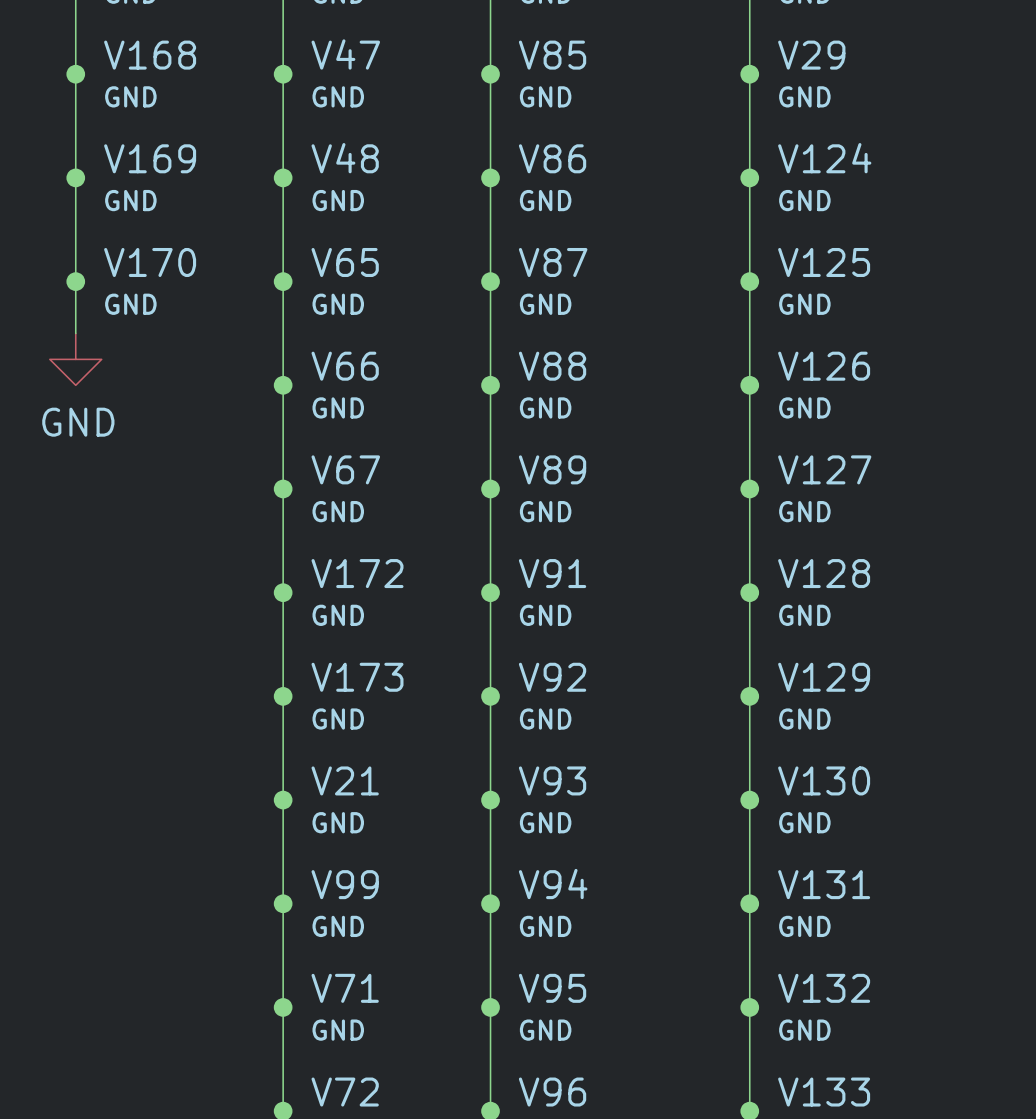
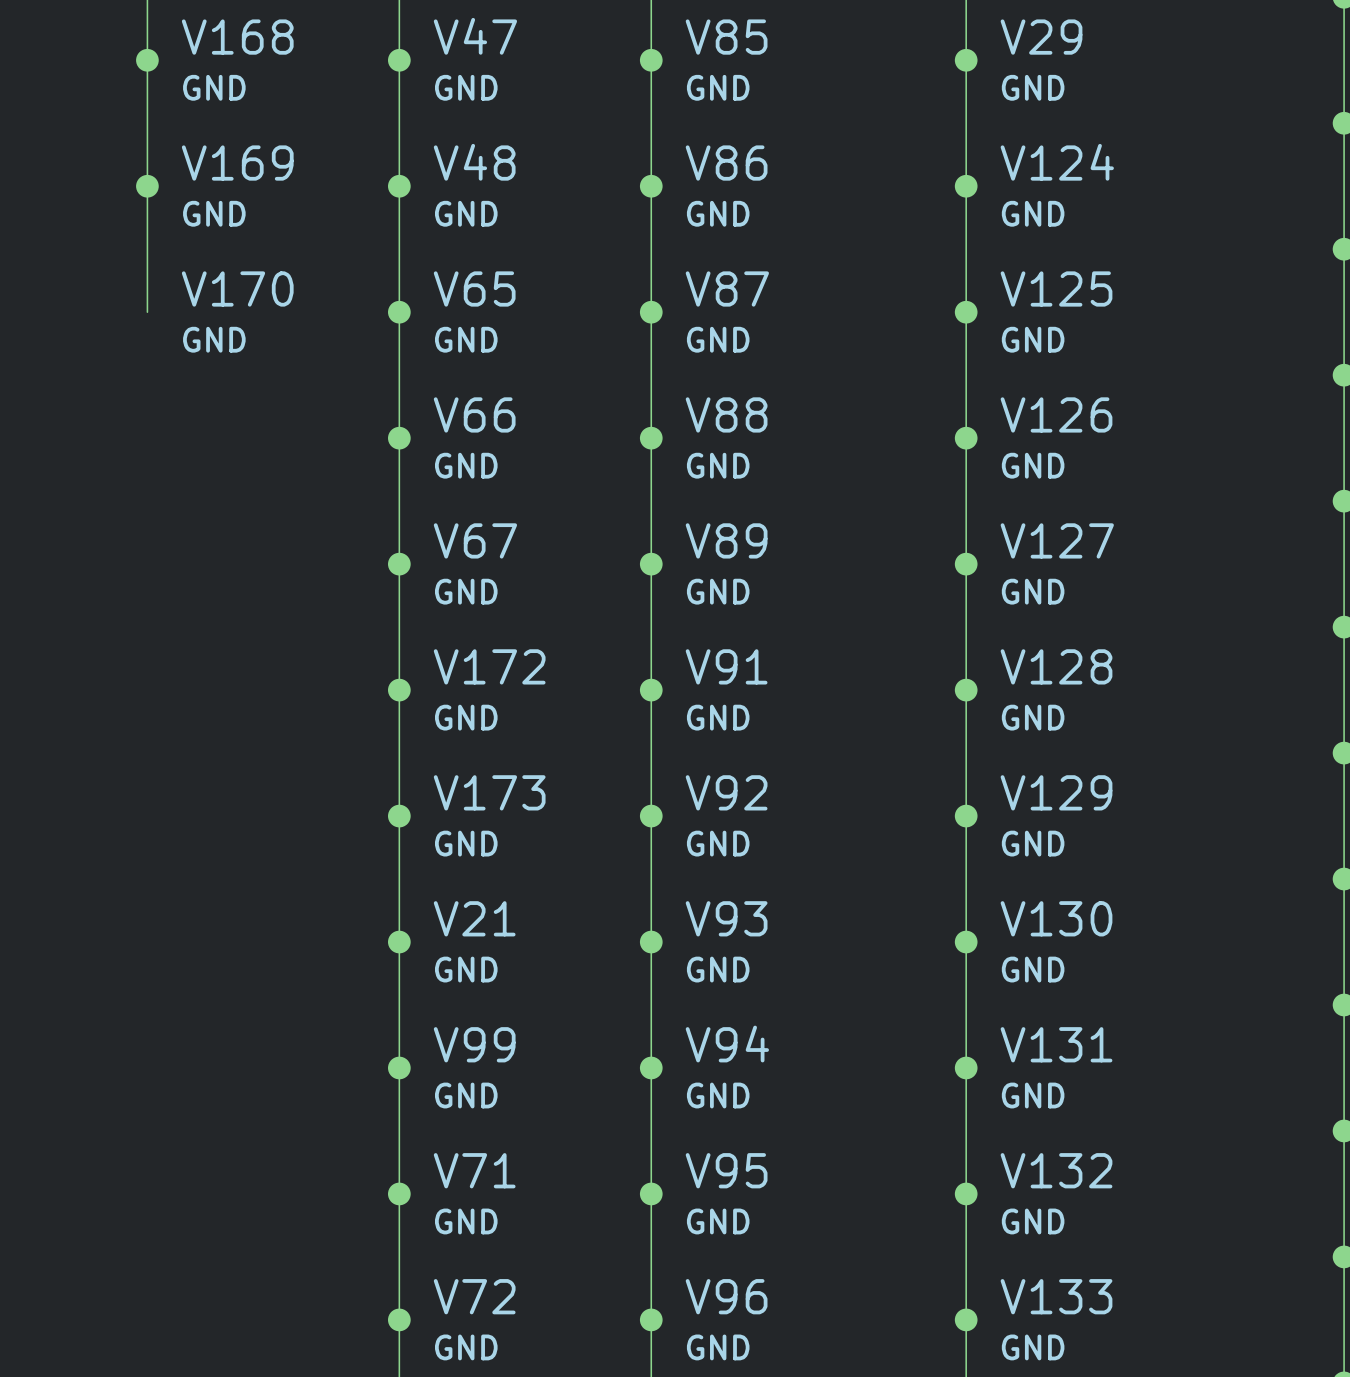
wire: (75, 281) (75, 333) -> none
junction: (75, 281) -> none
power symbol: GND (75, 359) -> none

